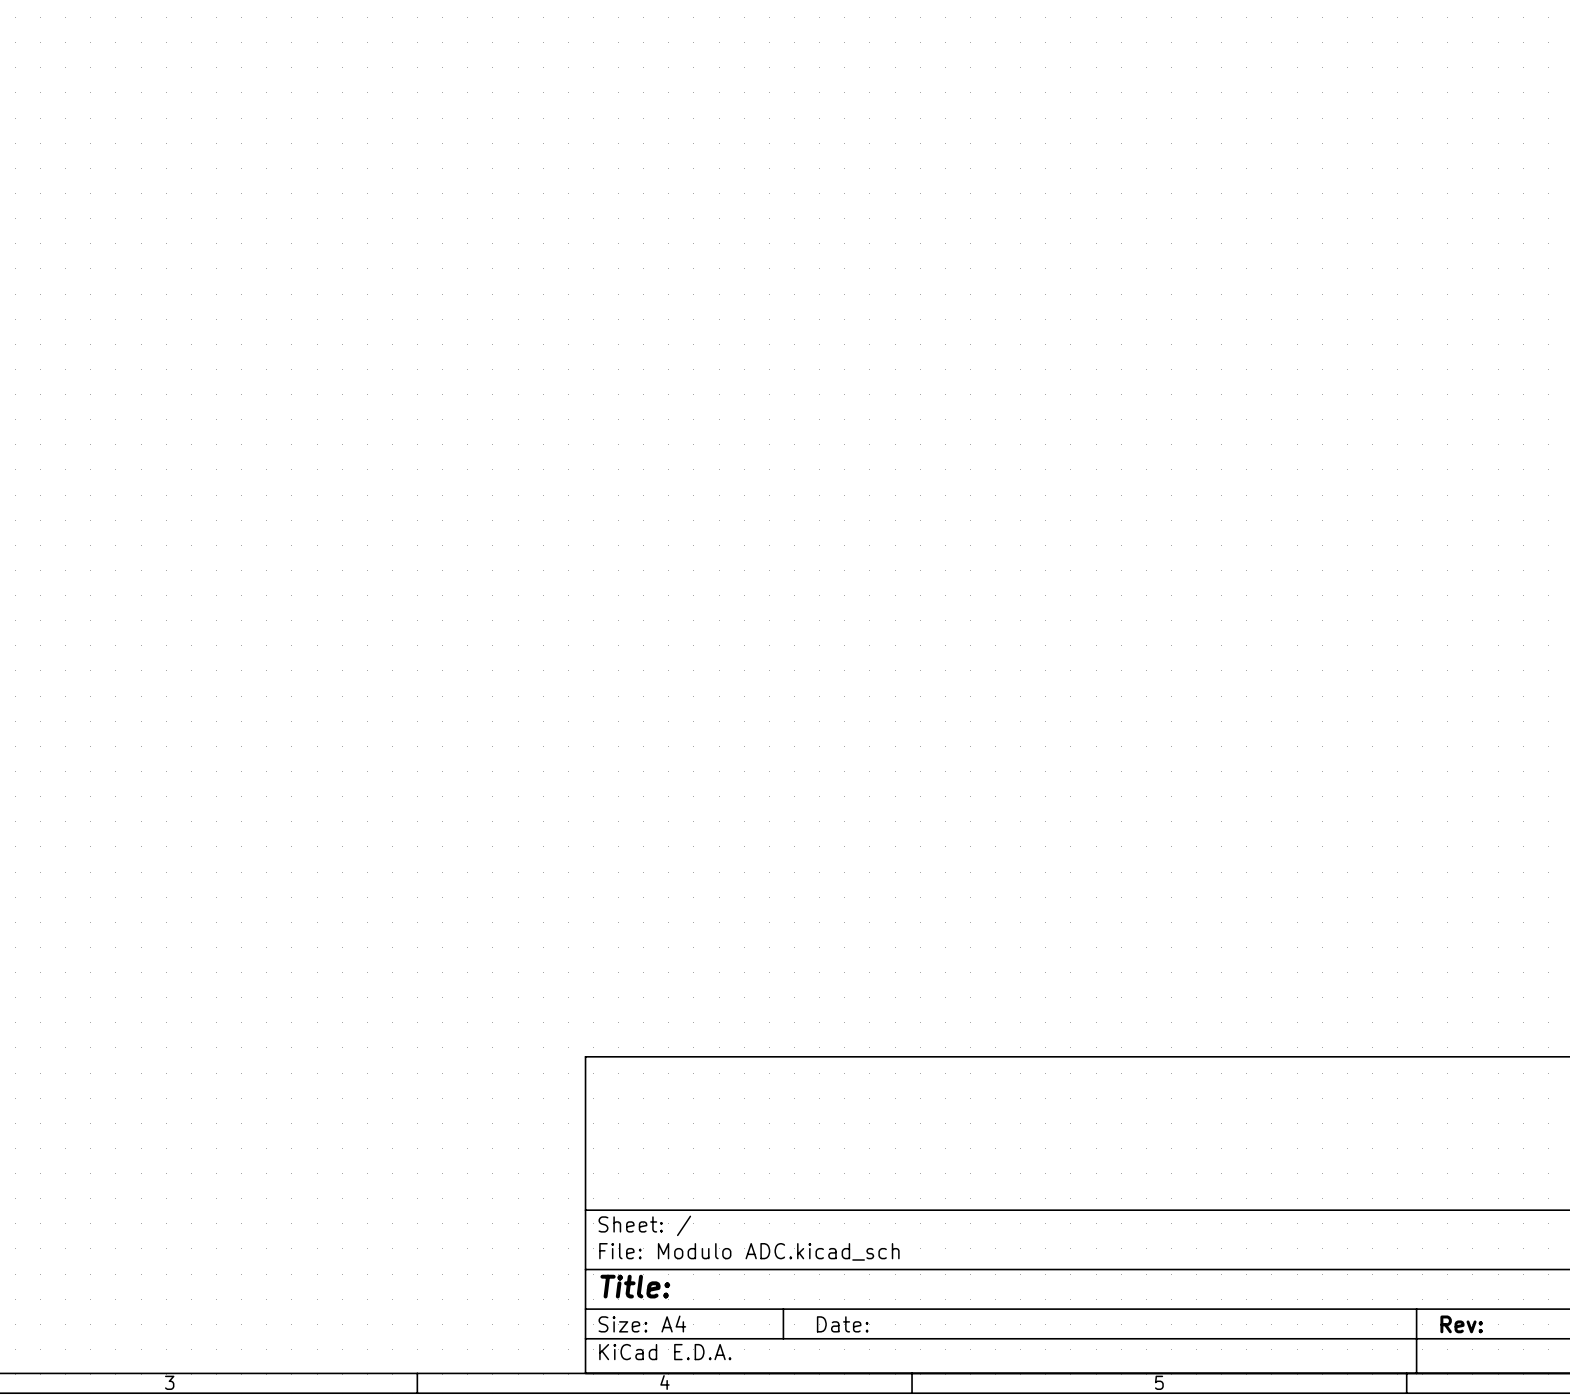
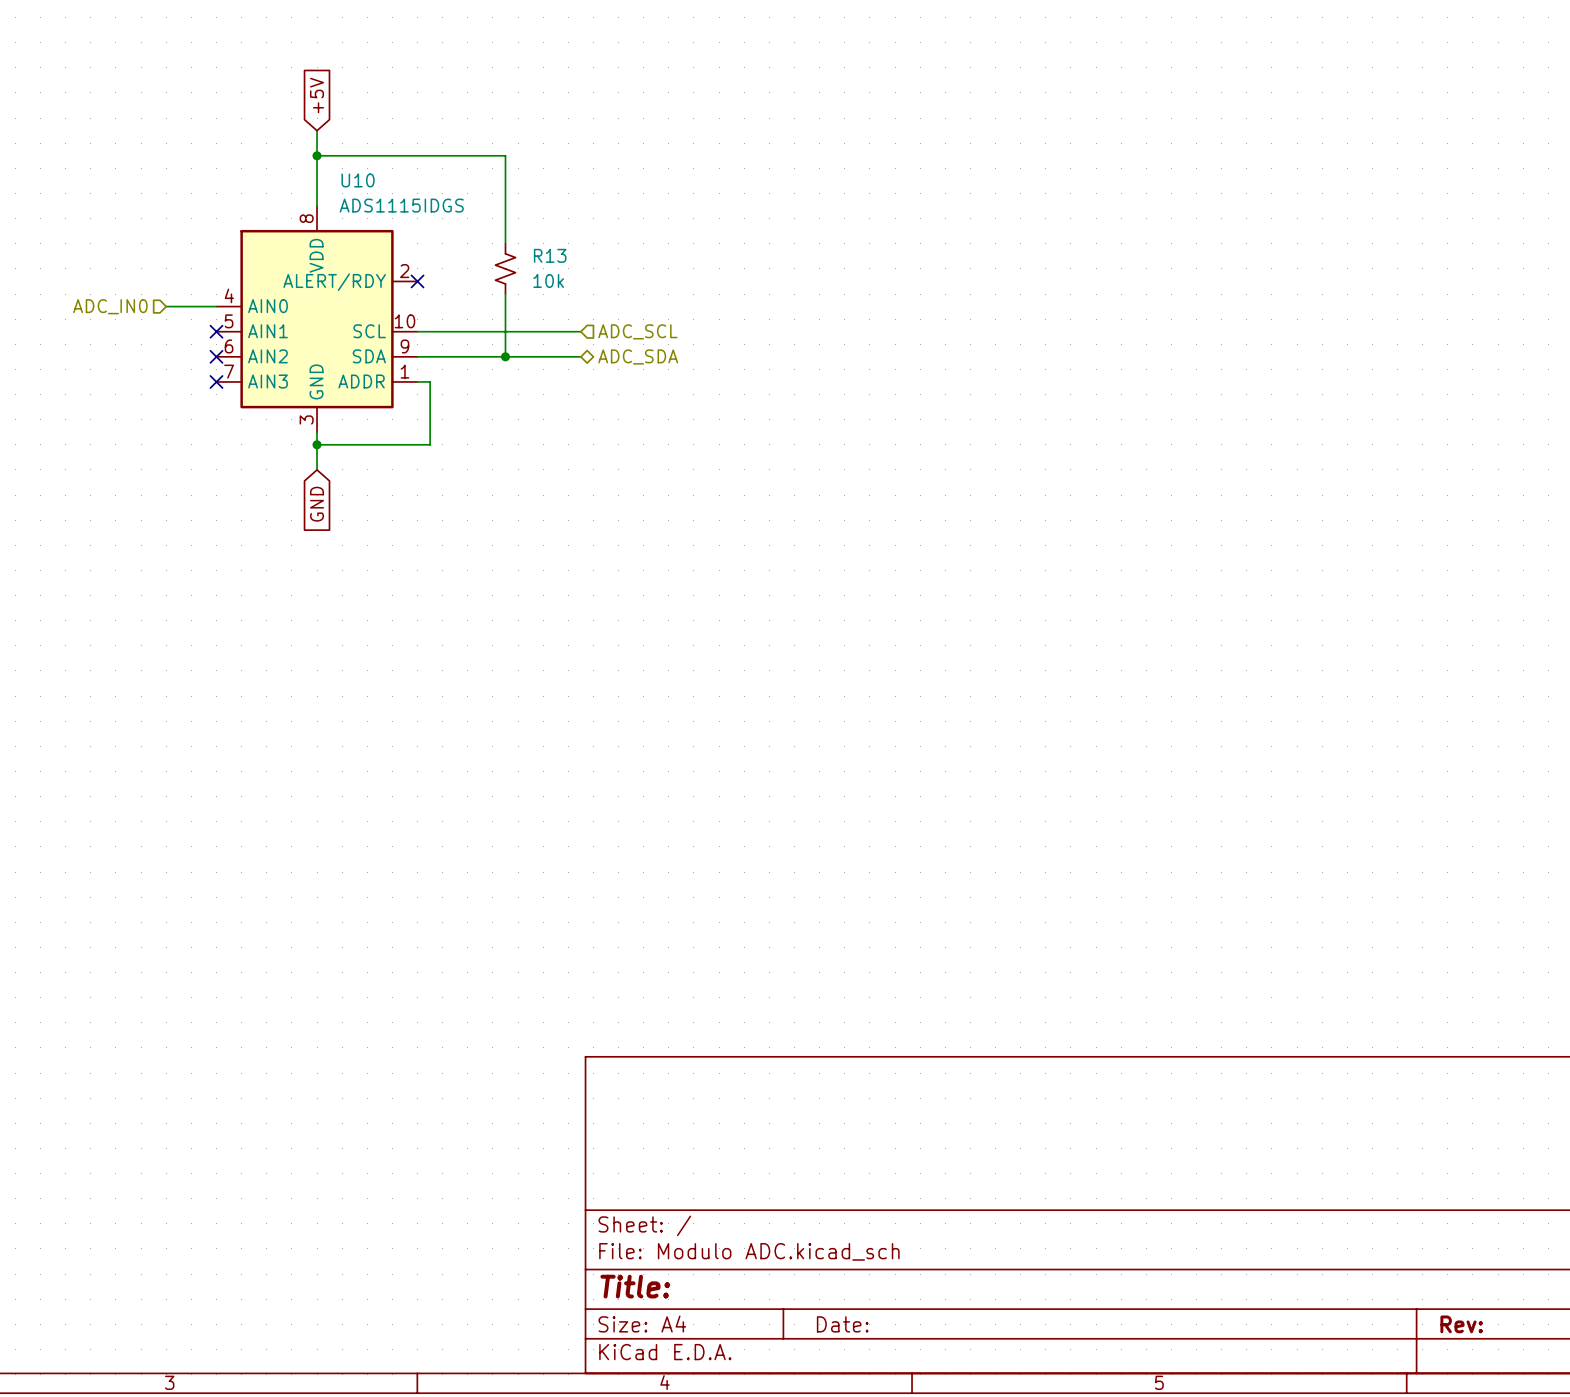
global label: none -> +5V (317, 95)
wire: none -> (317, 130) (317, 206)
wire: none -> (317, 155) (505, 155) (505, 243)
junction: none -> (317, 155)
R13: none -> 10k (505, 268)
no-connect mark: none -> (417, 281)
wire: none -> (505, 294) (505, 356)
hierarchical label: none -> ADC_IN0 (110, 306)
wire: none -> (166, 306) (216, 306)
U10: none -> ADS1115IDGS (317, 319)
no-connect mark: none -> (216, 331)
wire: none -> (417, 331) (580, 331)
hierarchical label: none -> ADC_SCL (637, 331)
no-connect mark: none -> (216, 356)
wire: none -> (417, 356) (580, 356)
junction: none -> (505, 356)
hierarchical label: none -> ADC_SDA (638, 356)
no-connect mark: none -> (216, 381)
wire: none -> (417, 381) (430, 381) (430, 444) (317, 444)
wire: none -> (317, 432) (317, 469)
junction: none -> (317, 444)
global label: none -> GND (317, 504)

